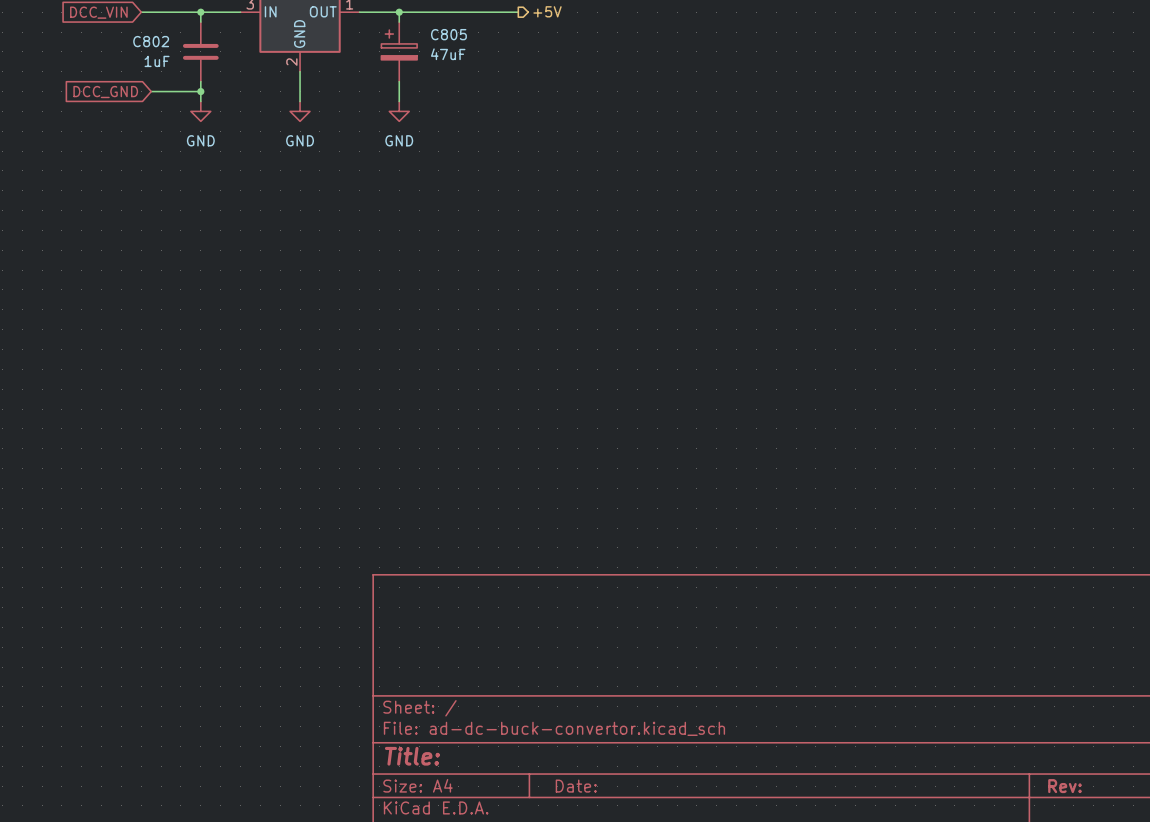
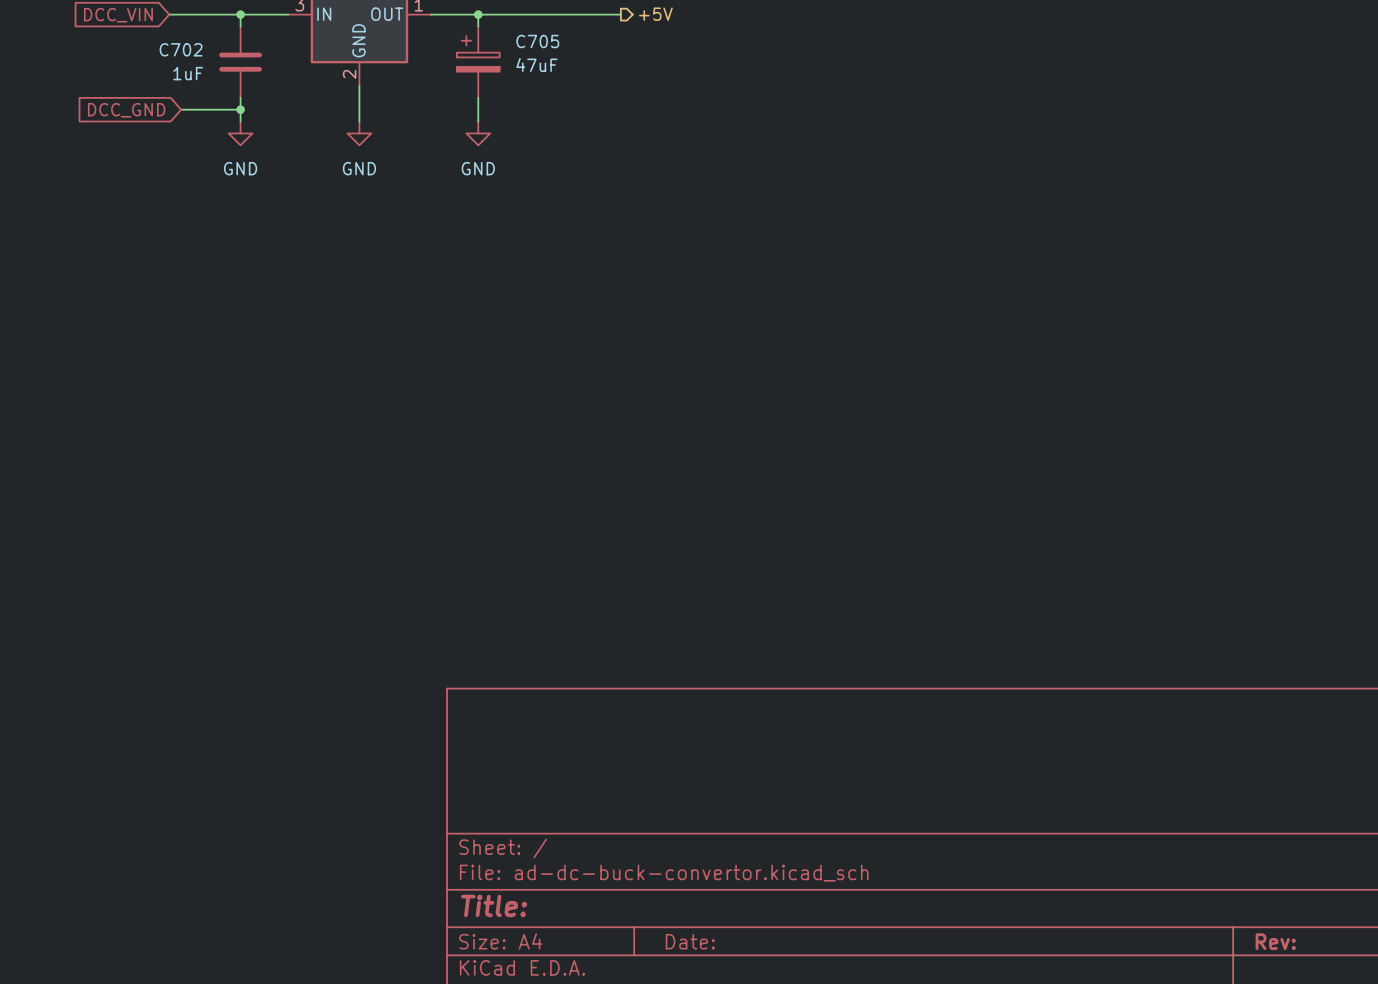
C805 name: C805 (448, 34) -> C705 (537, 41)
C802 name: C802 (151, 41) -> C702 (181, 49)

